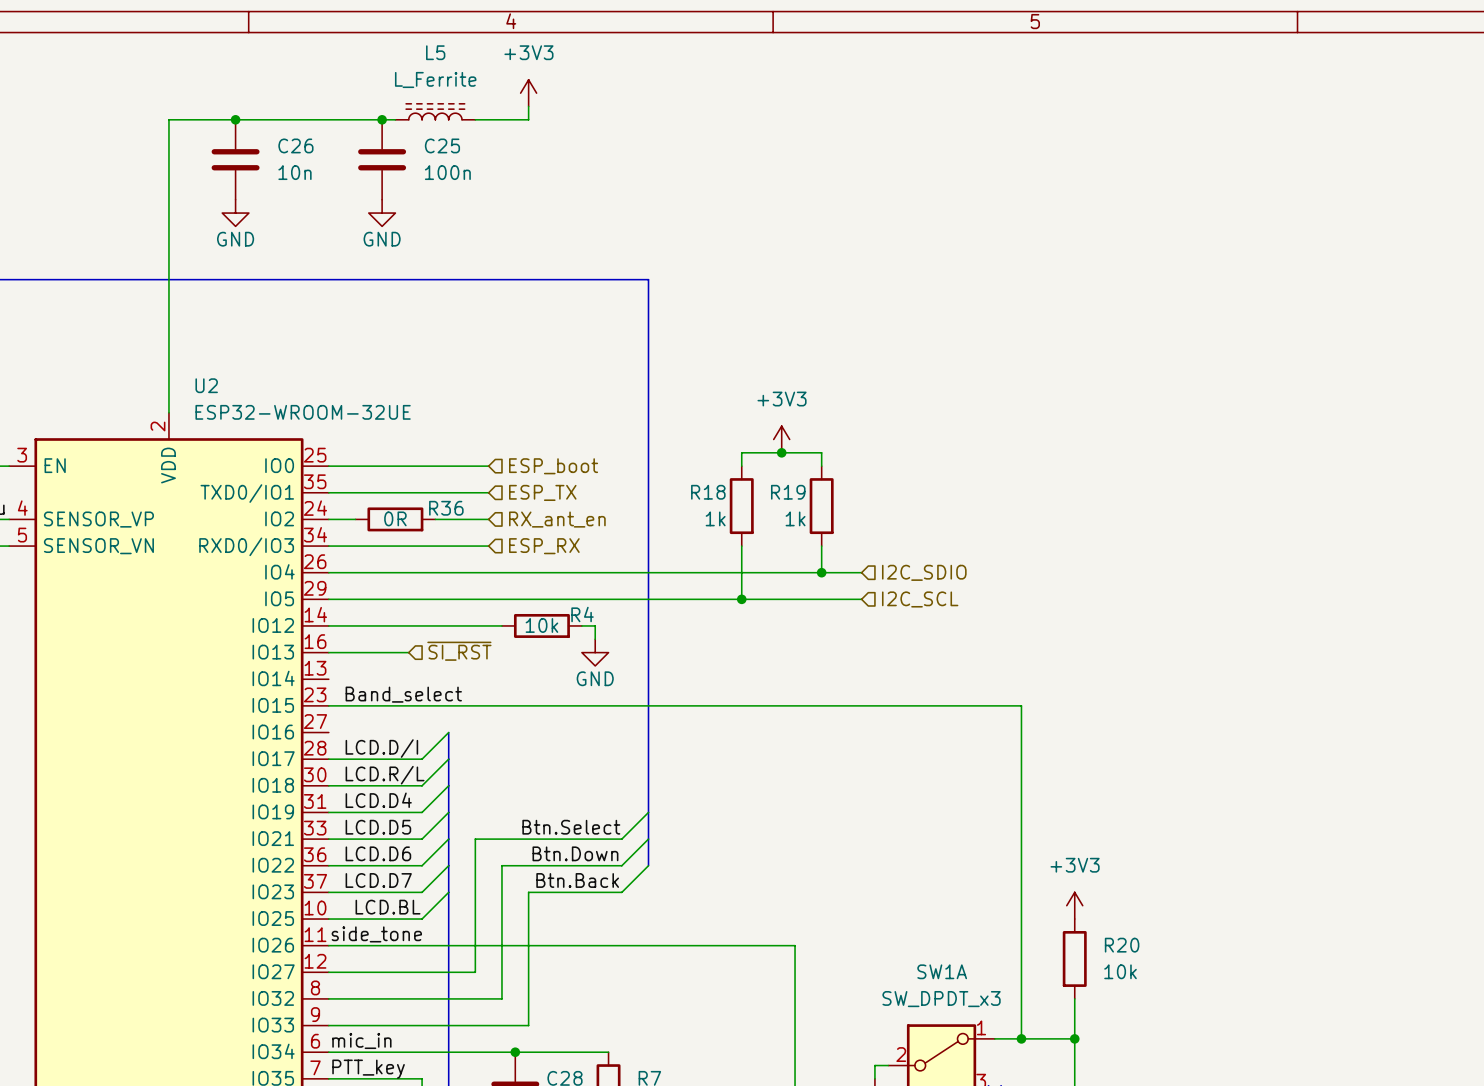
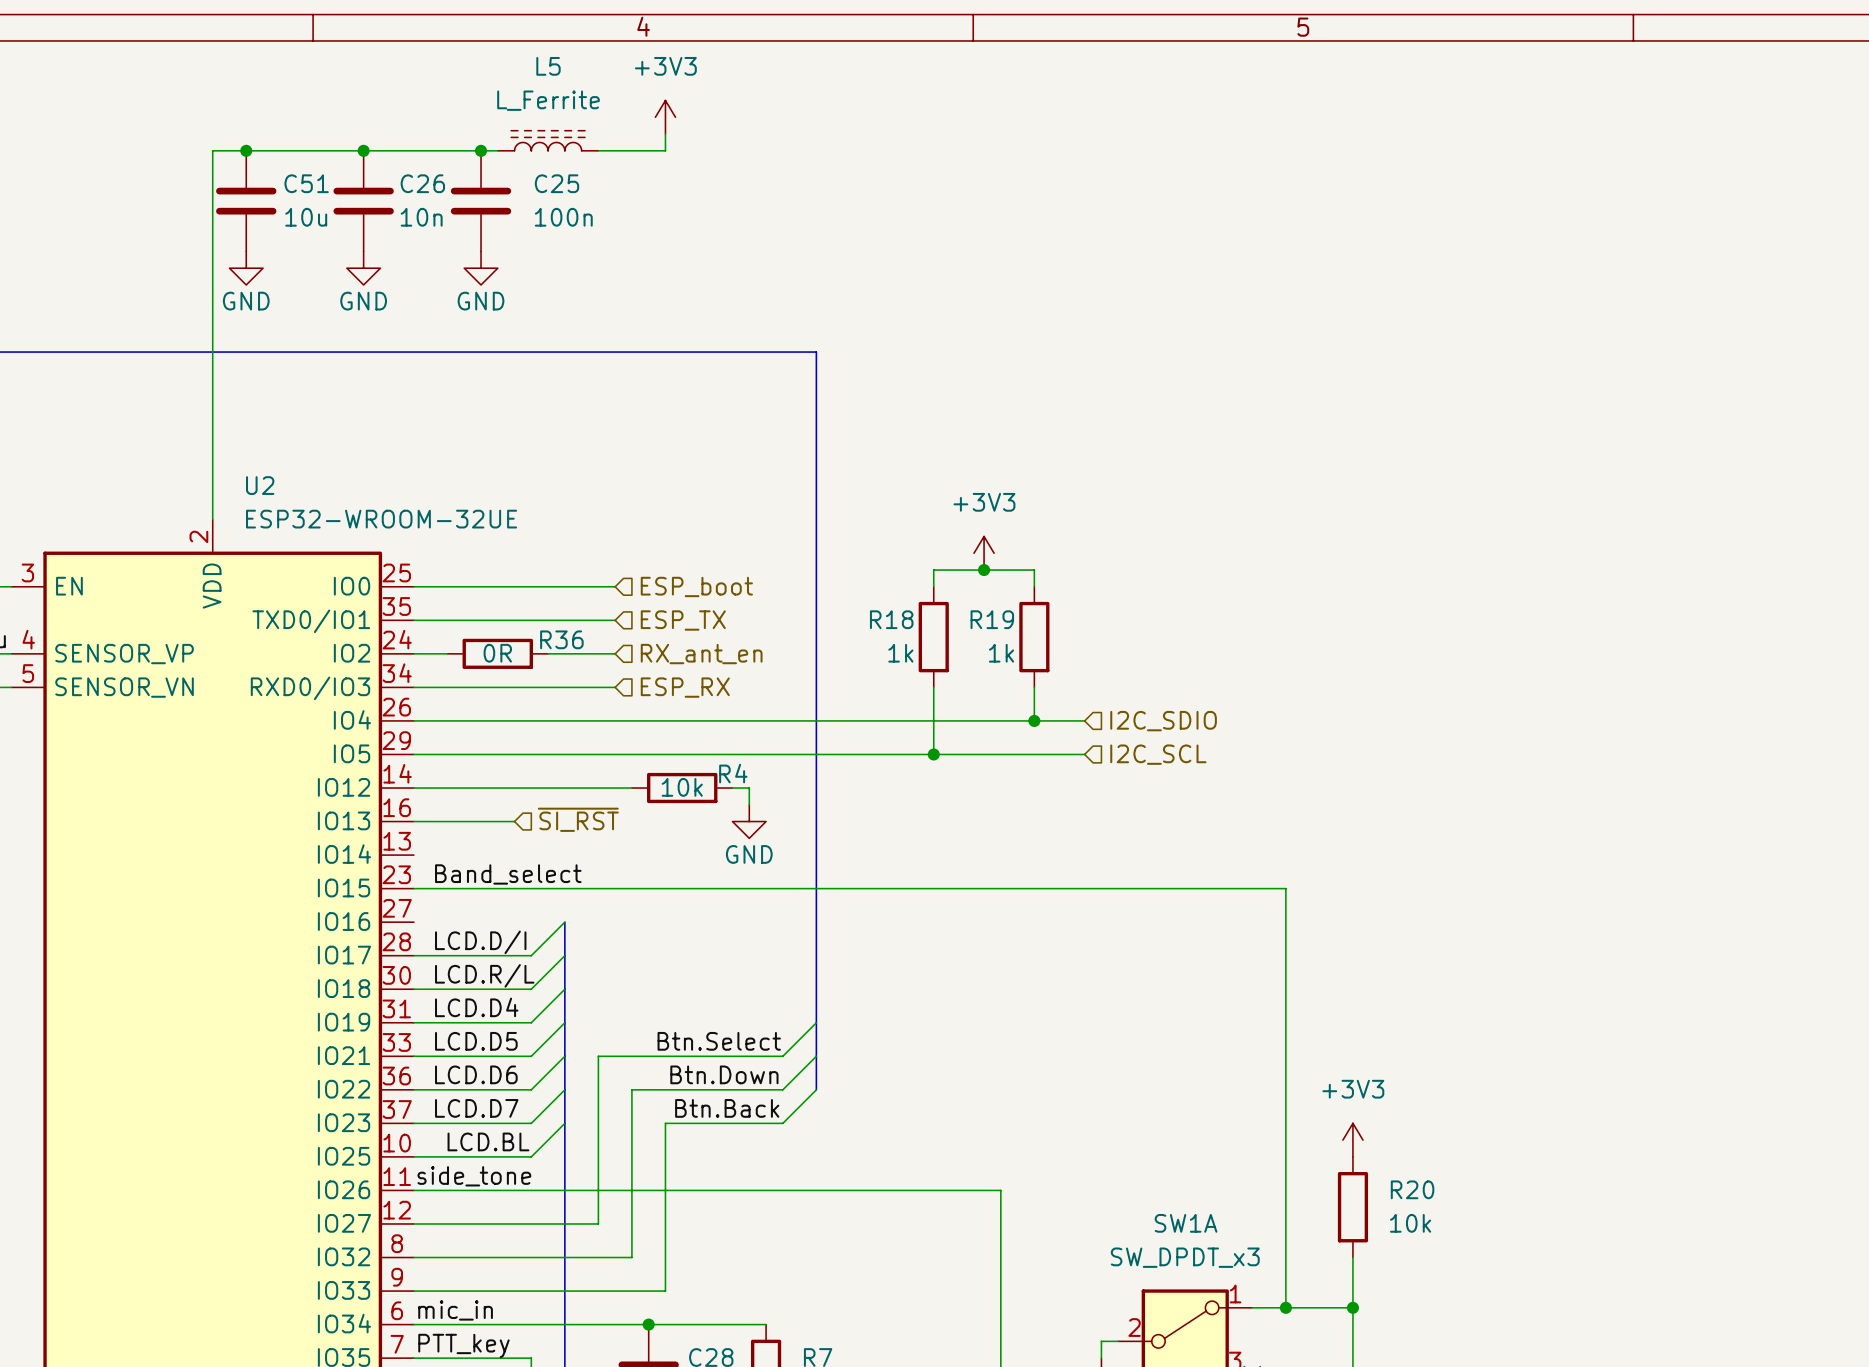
junction: none -> (246, 150)
junction: (235, 119) -> none
junction: none -> (363, 150)
C26 name position: C26 (295, 145) -> C26 (422, 183)
C51: none -> 10u (246, 201)
C26 position: (235, 159) -> (363, 201)
C26 value position: 10n (294, 172) -> 10n (421, 217)
power symbol: none -> GND (246, 268)
power symbol: GND (235, 213) -> none
power symbol: none -> GND (363, 268)

